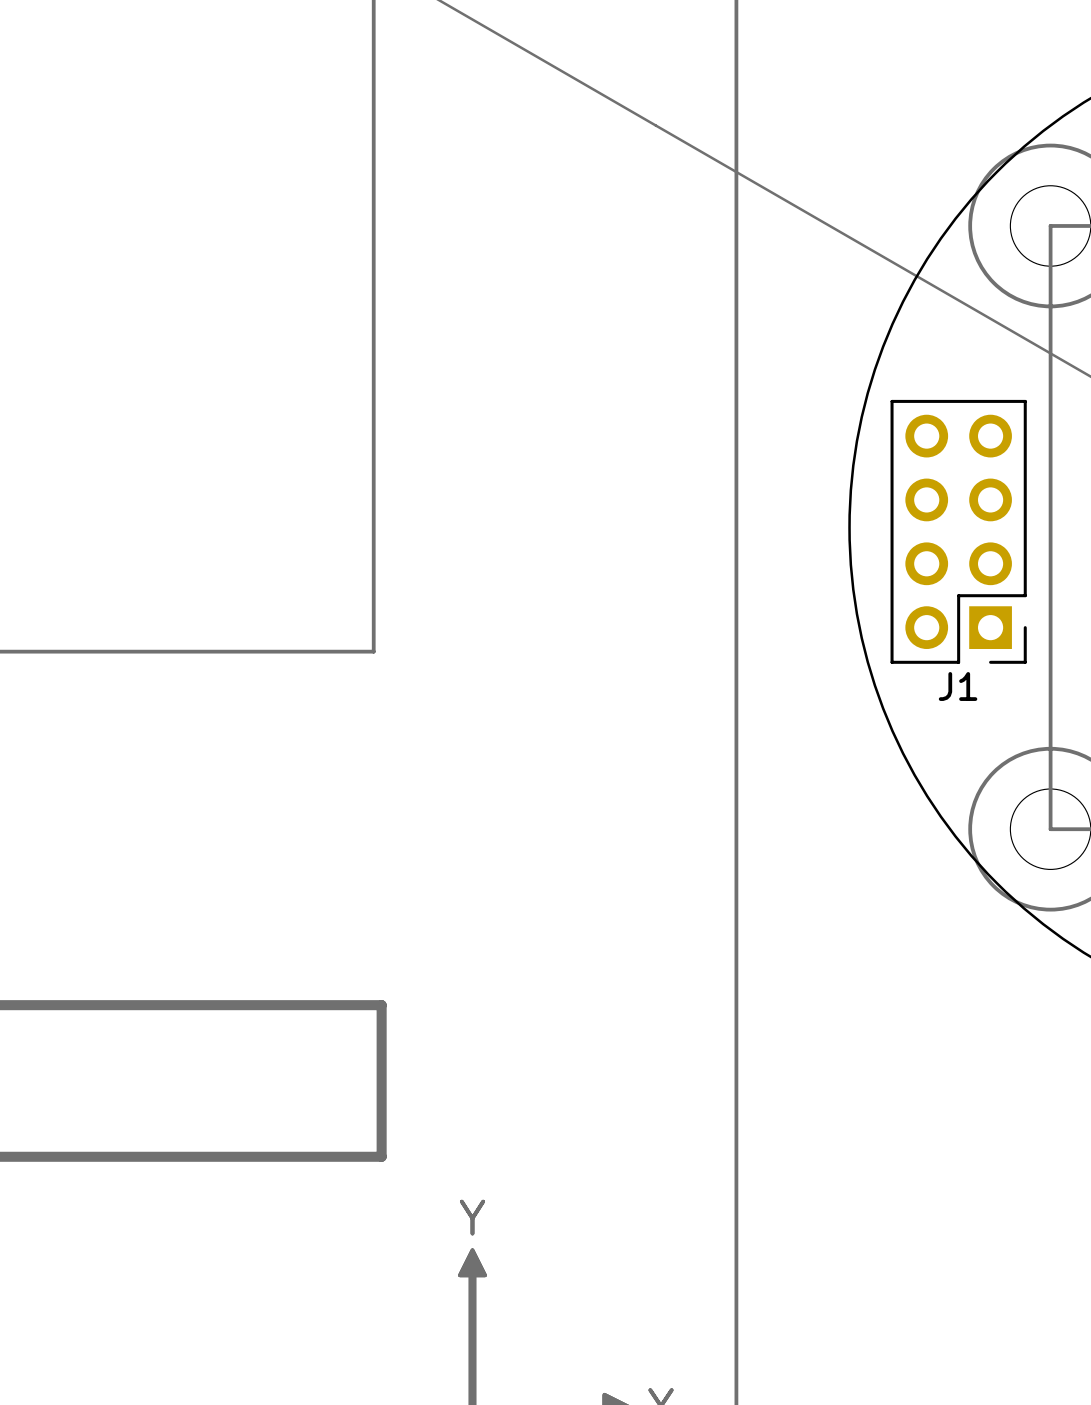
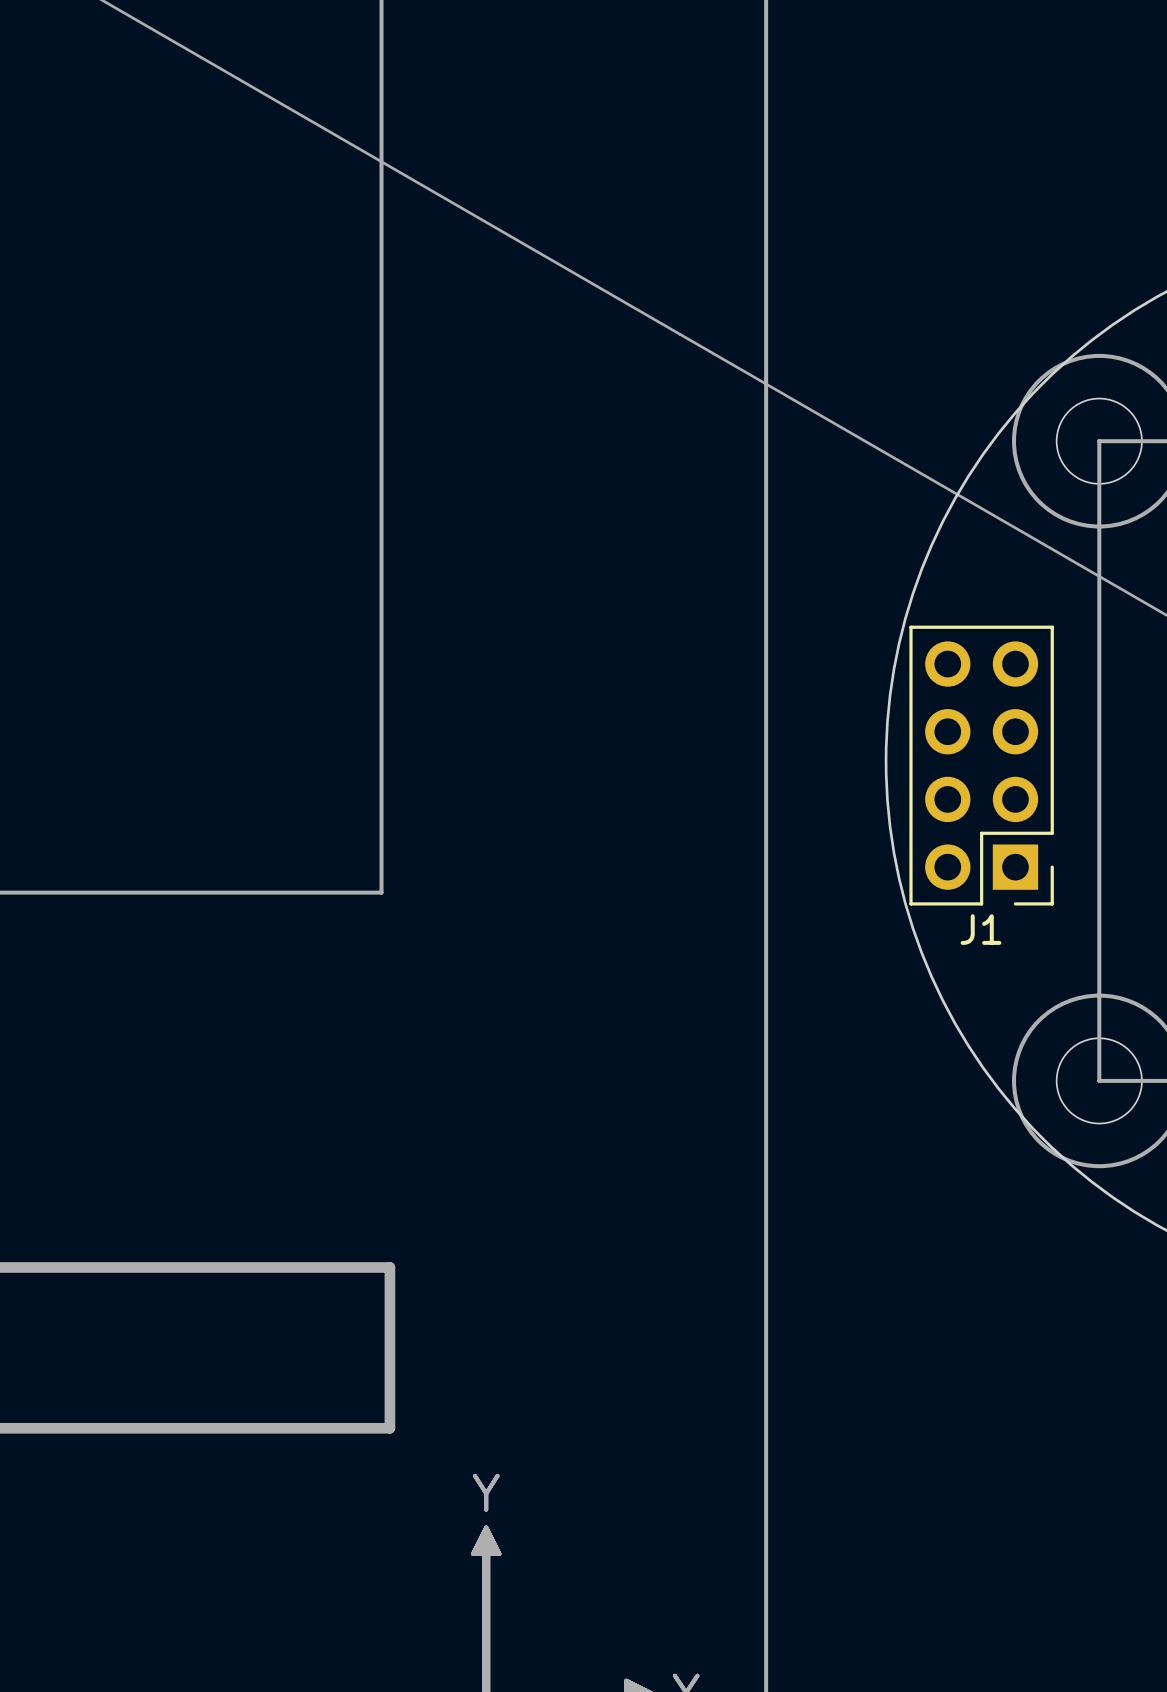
J1 position: (958, 531) -> (981, 765)

